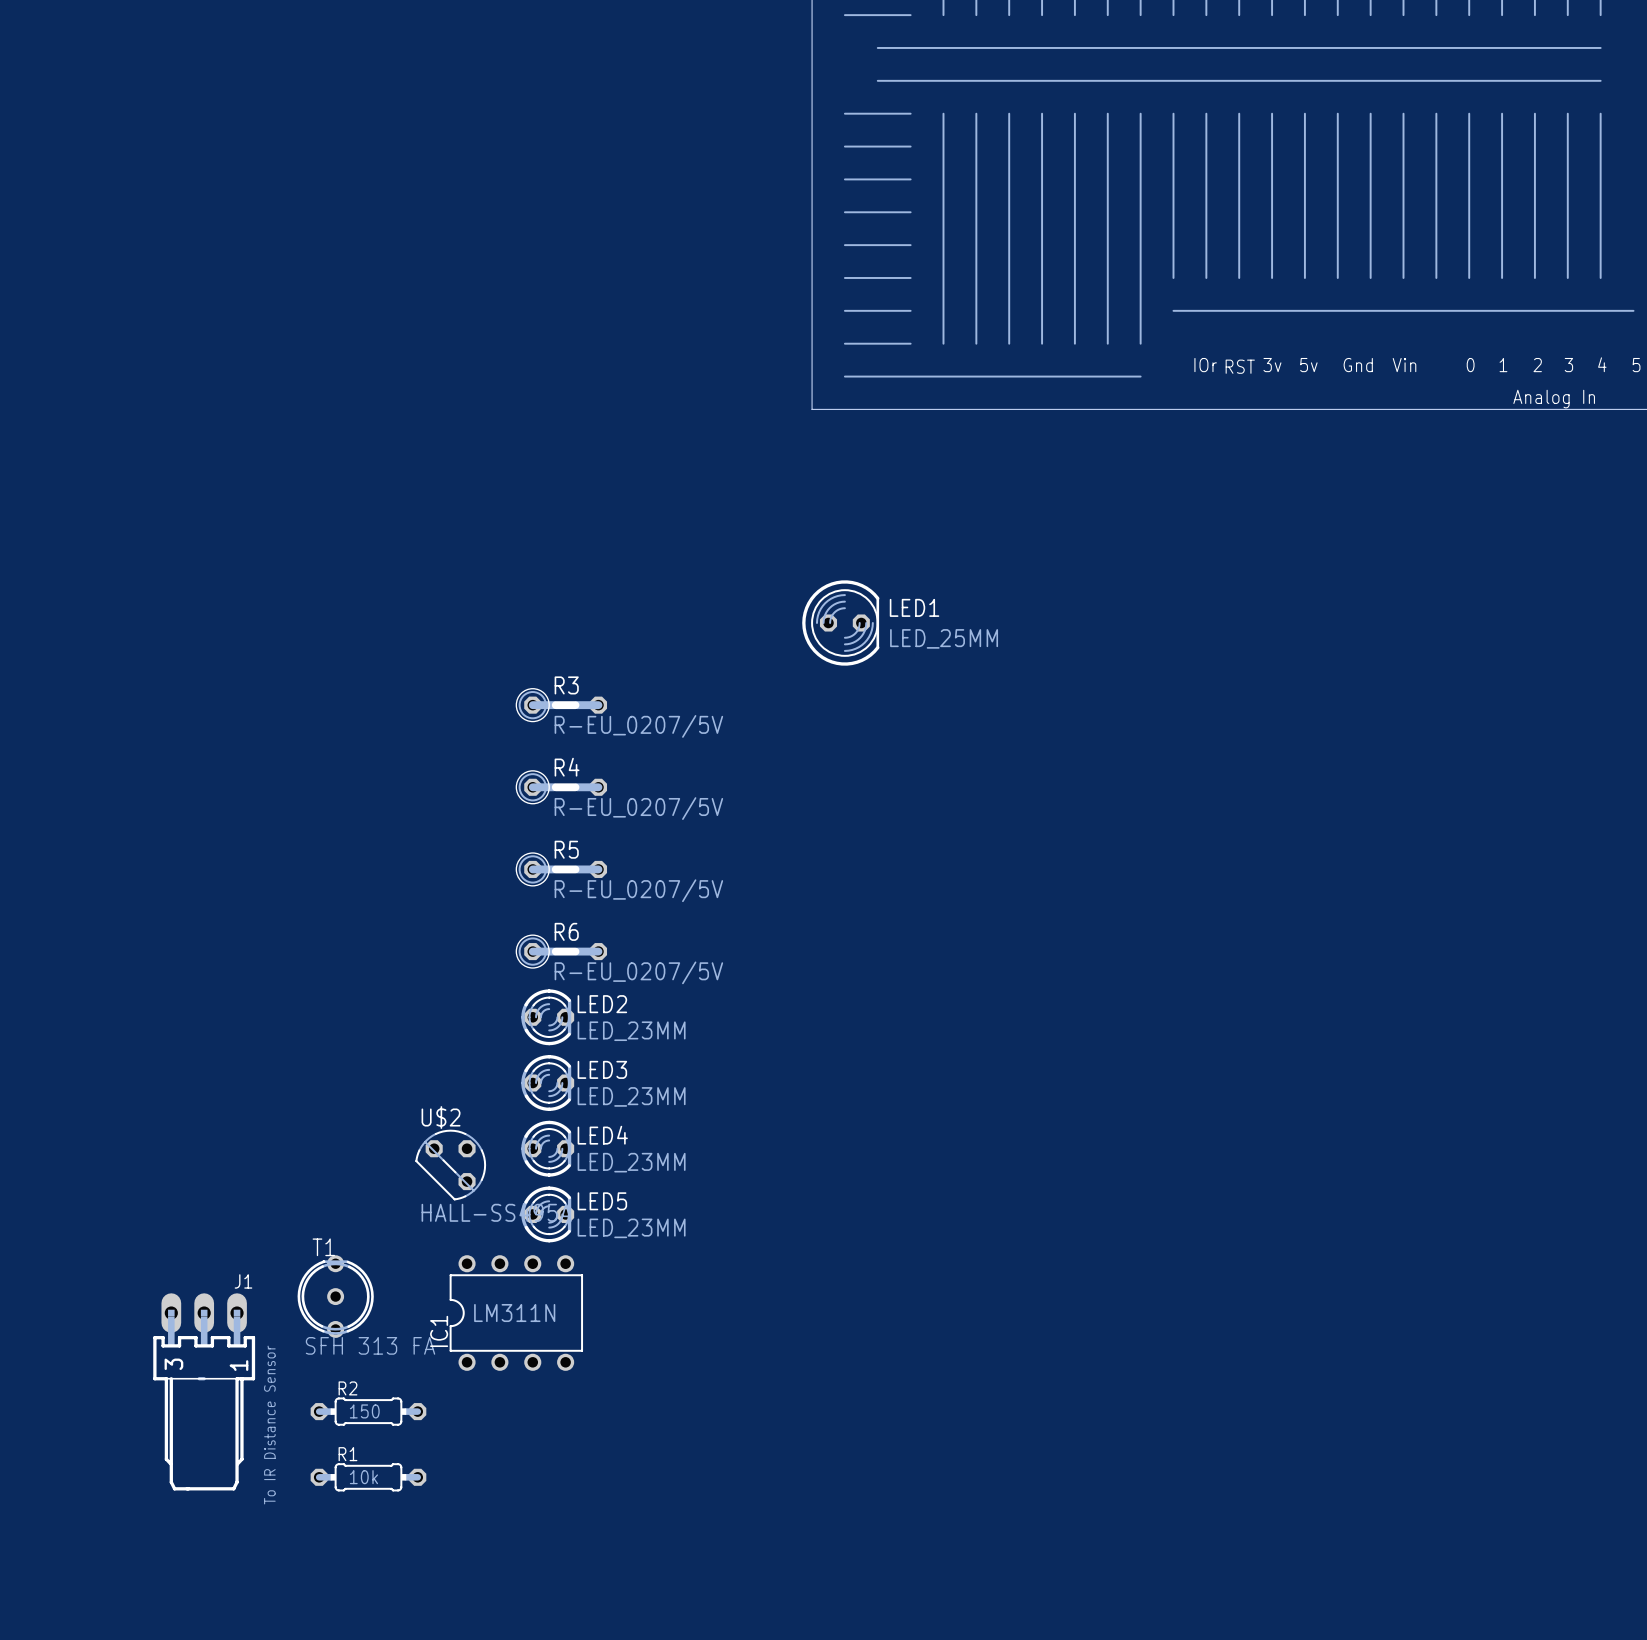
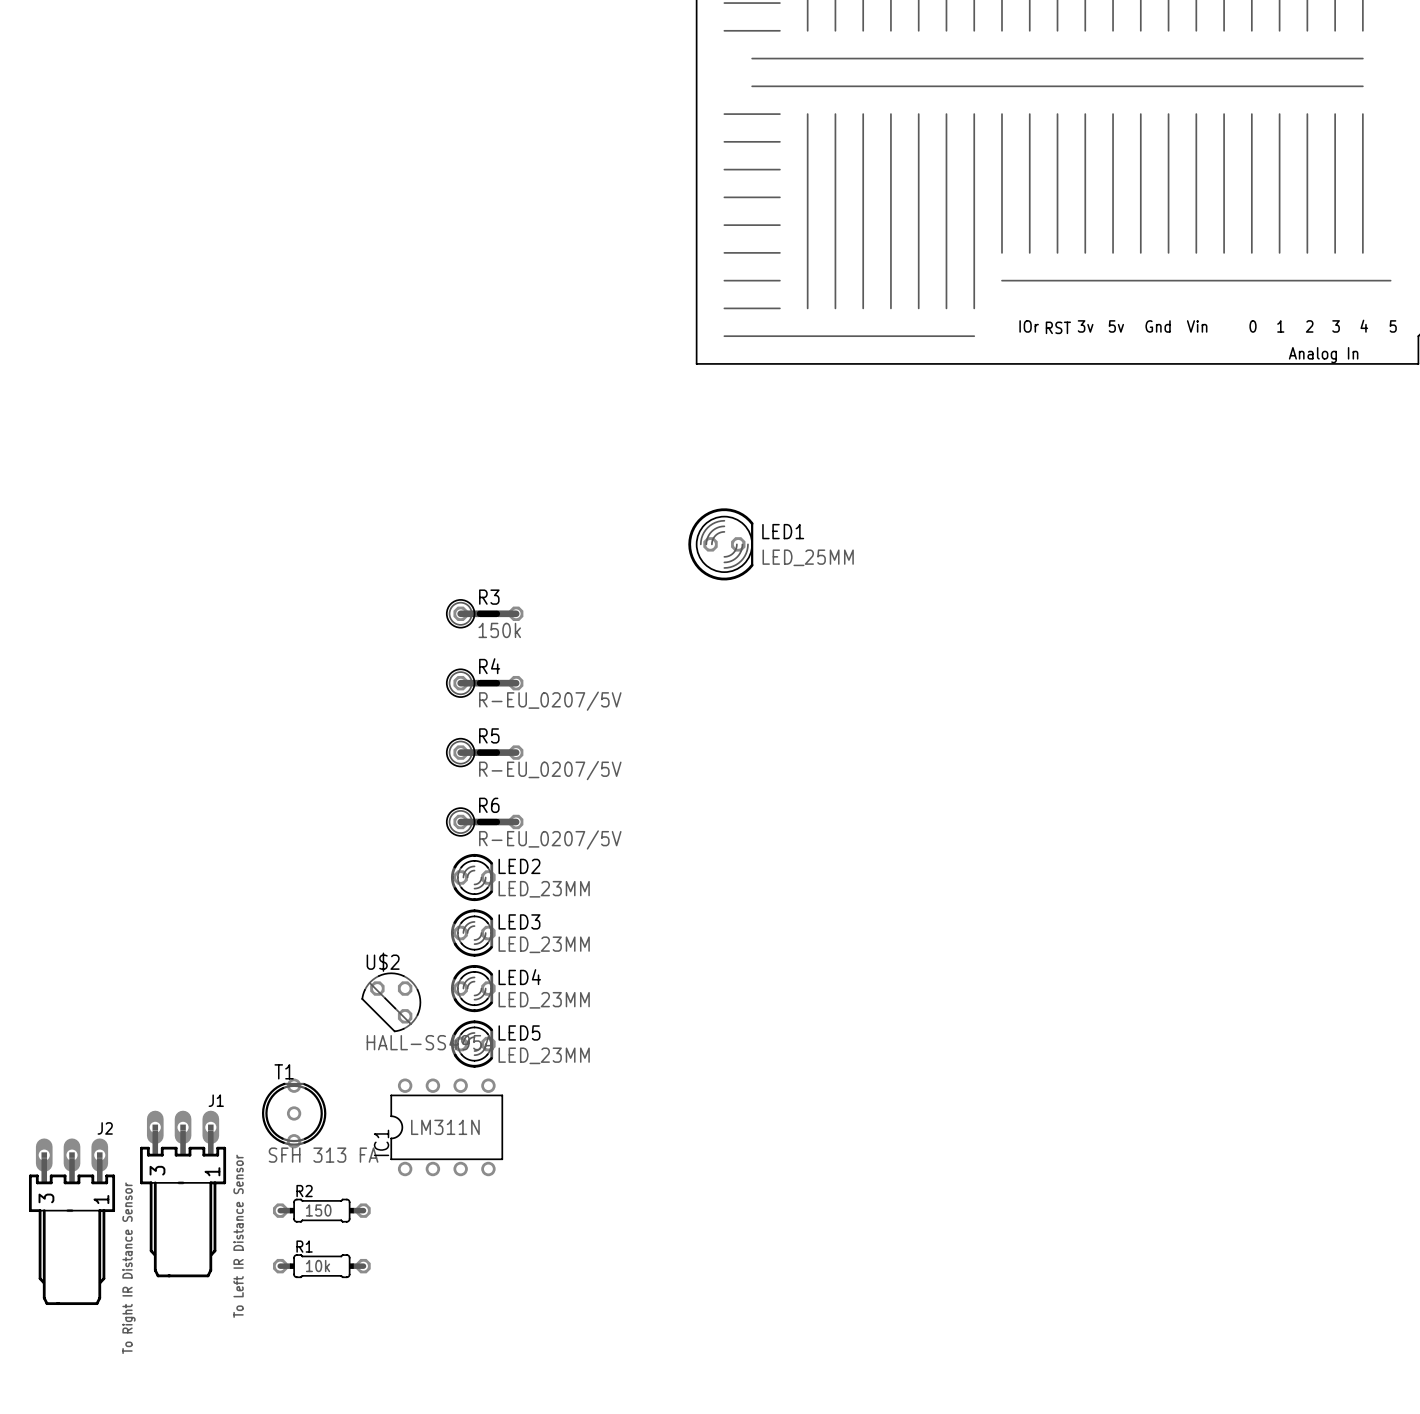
R3 value: R-EU_0207/5V (638, 726) -> 150k (499, 630)
J2: none -> To Right IR Distance Sensor (72, 1221)
J1 value: To IR Distance Sensor (269, 1425) -> To Left IR Distance Sensor (238, 1236)

